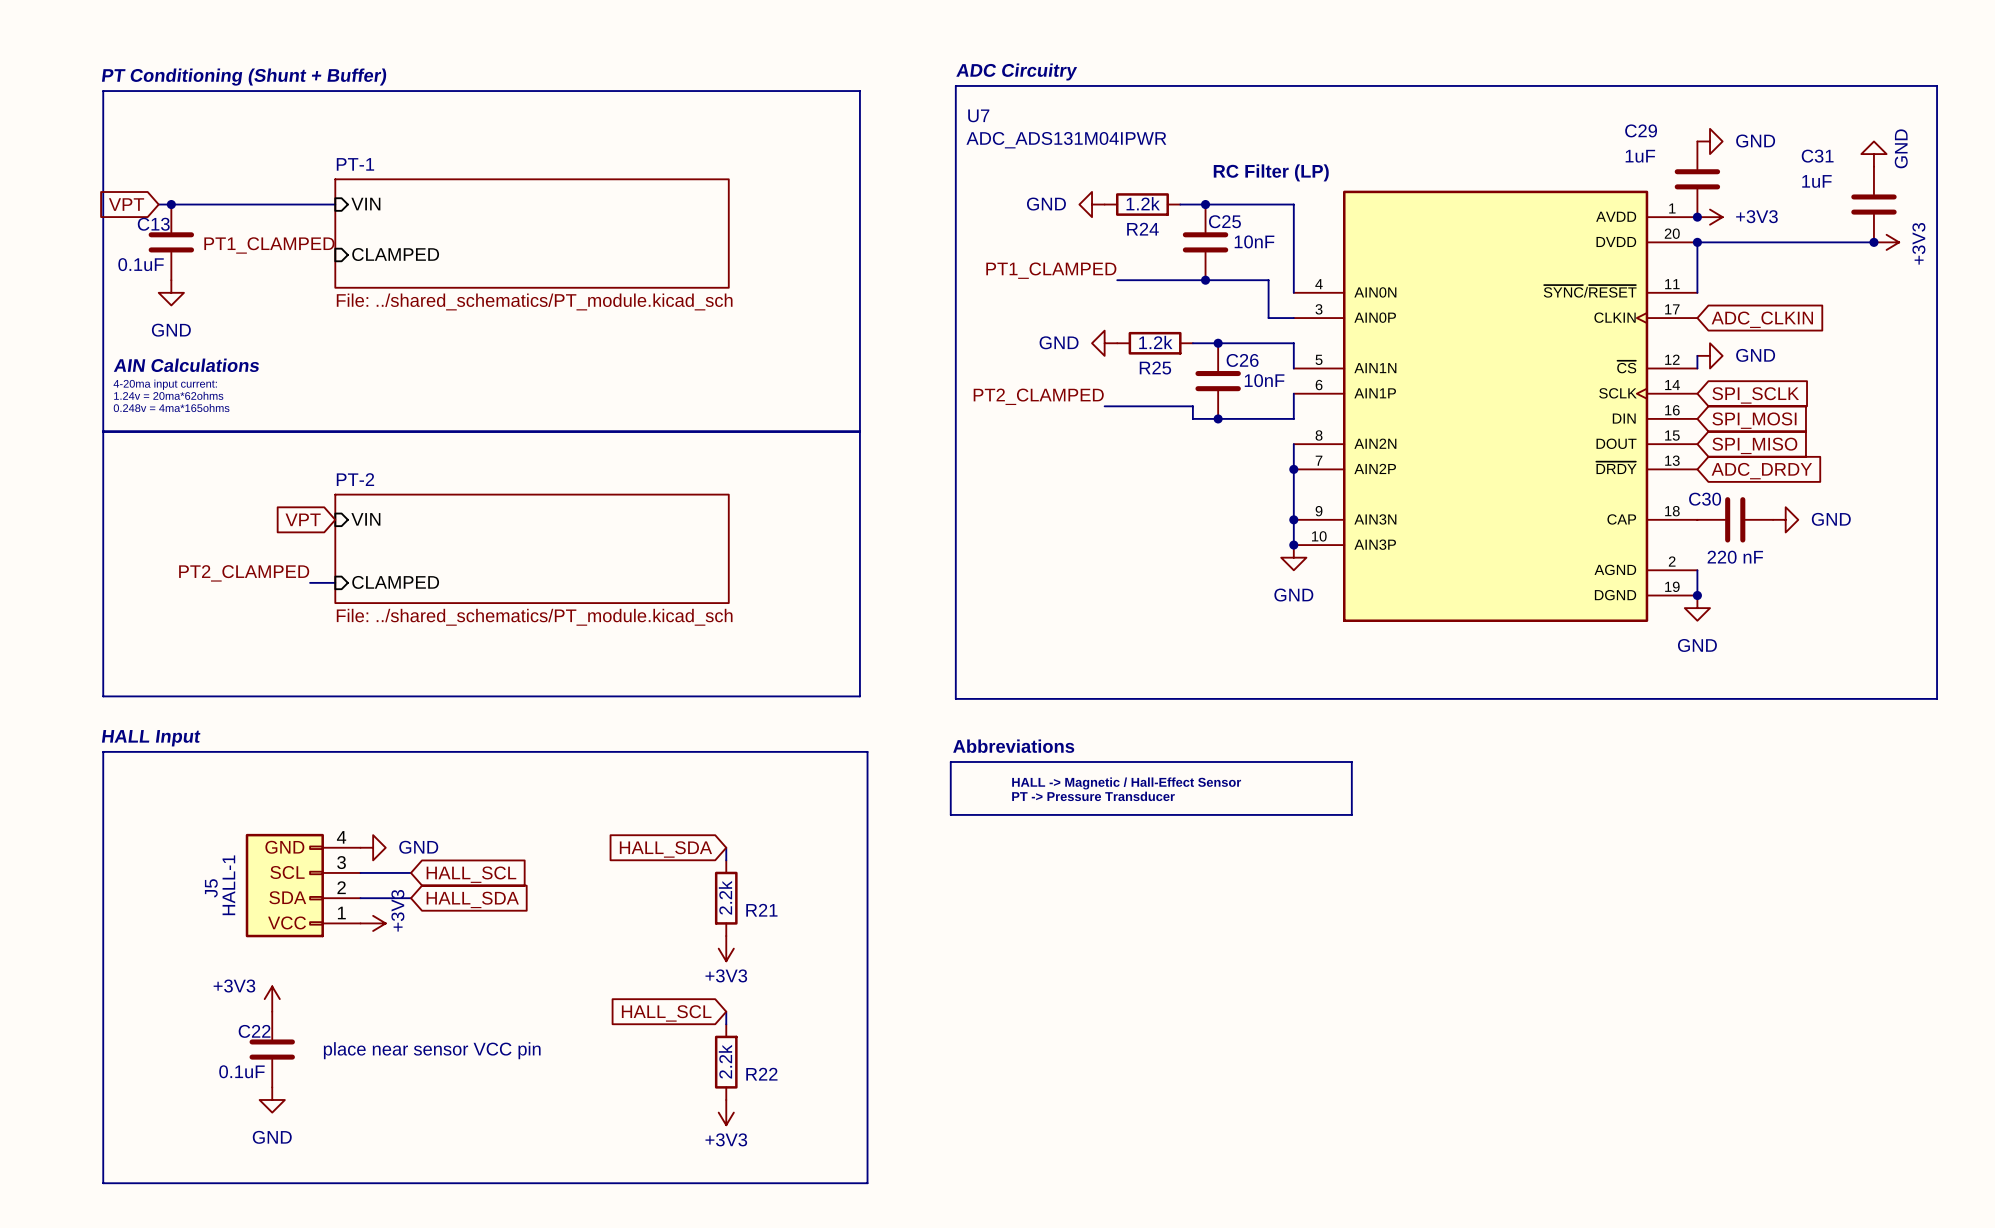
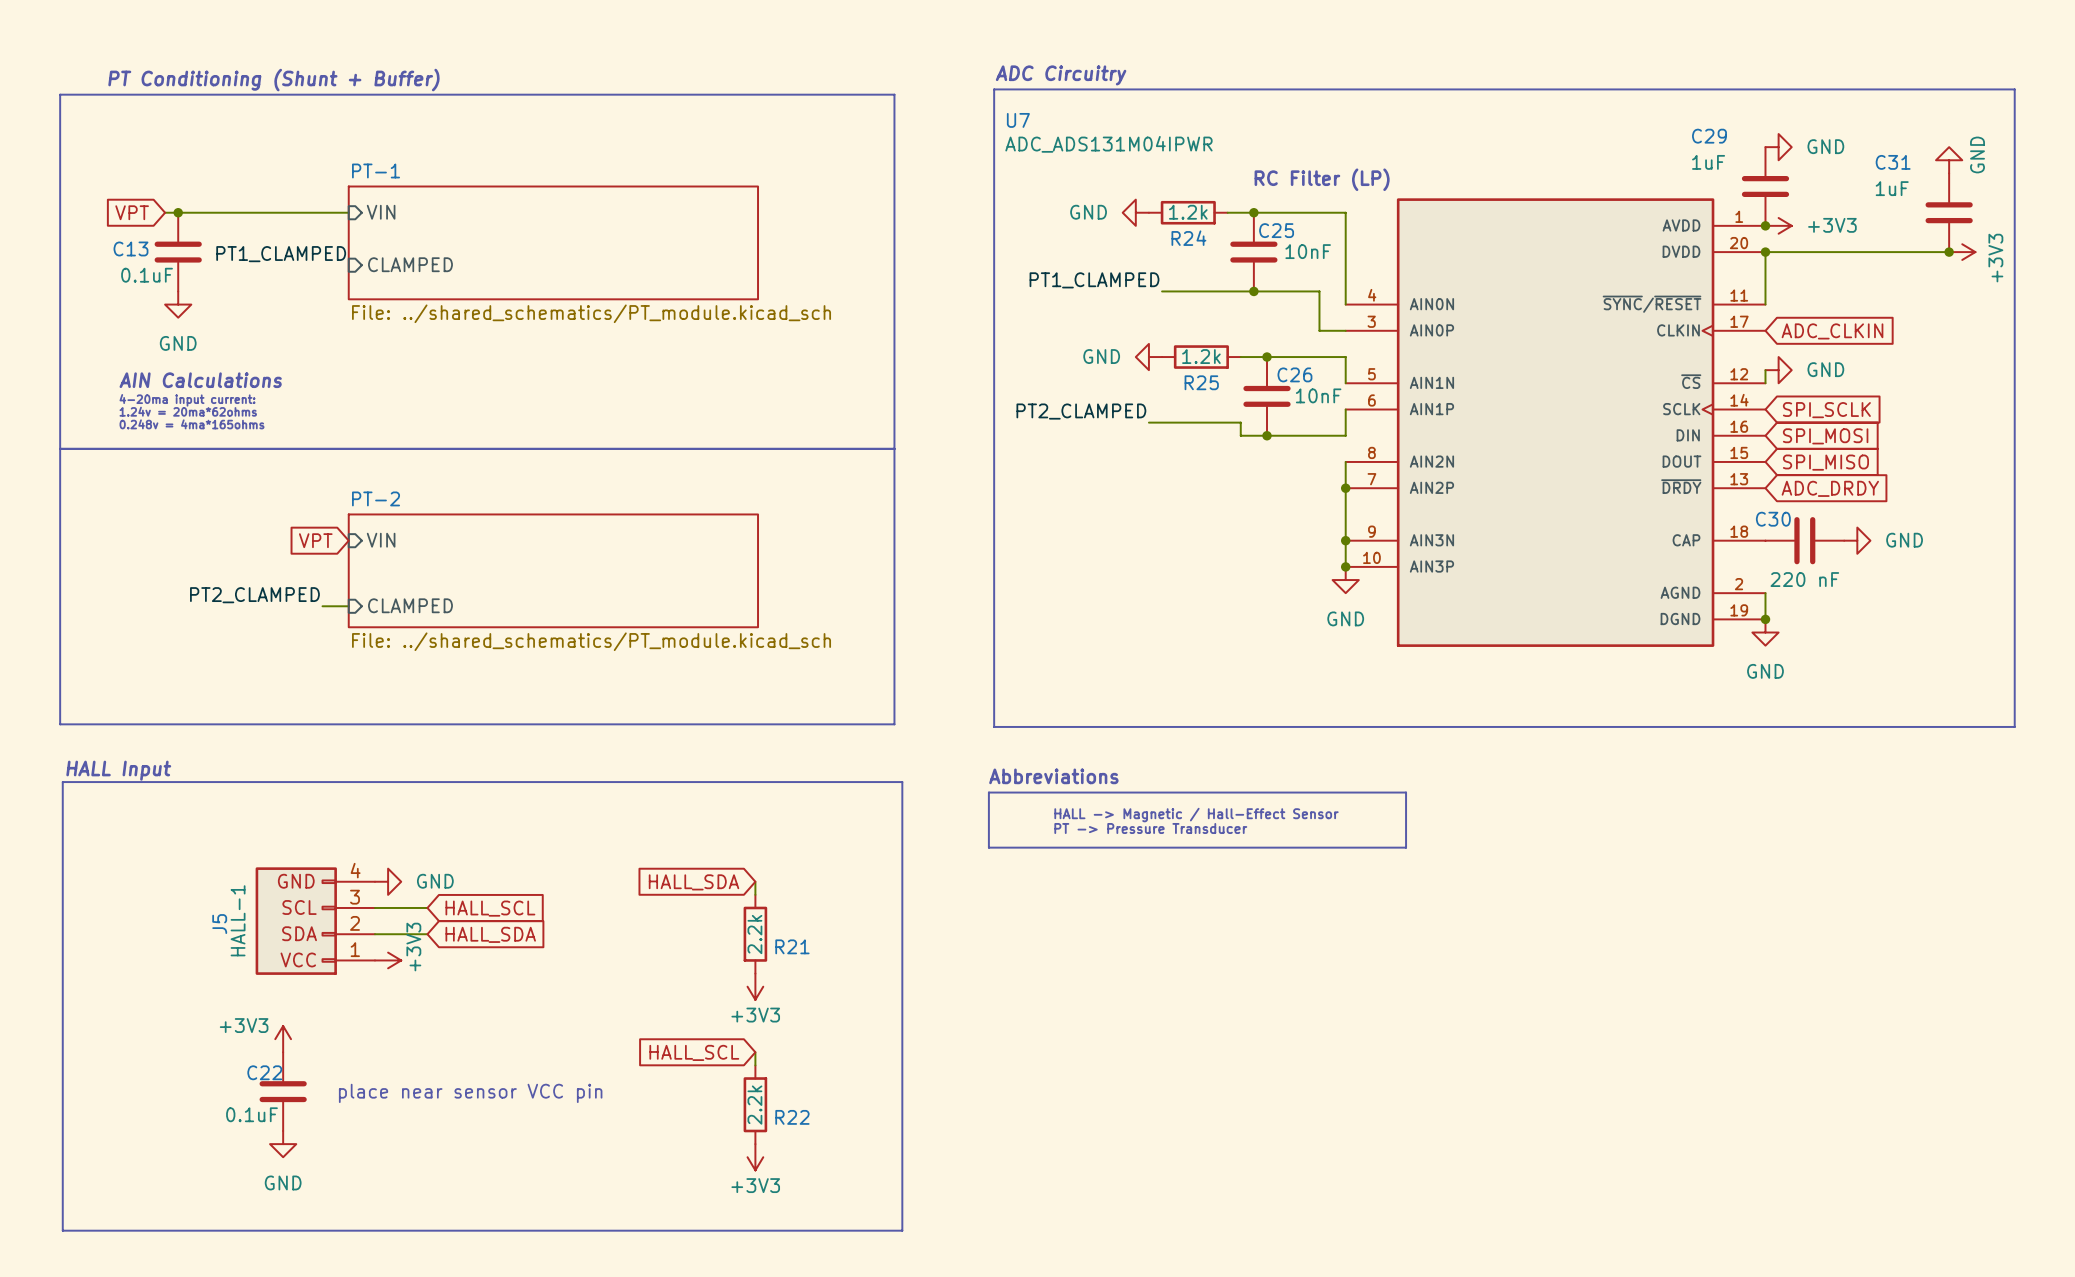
line: (103, 91) (103, 696) -> (107, 94) (60, 94) (60, 724) (107, 724)
C13 name position: C13 (153, 224) -> C13 (130, 248)
line: none -> (60, 448) (107, 448)
text position: HALL Input (151, 738) -> HALL Input (118, 770)
line: (103, 751) (103, 1183) -> (107, 782) (62, 782) (62, 1230) (107, 1230)

